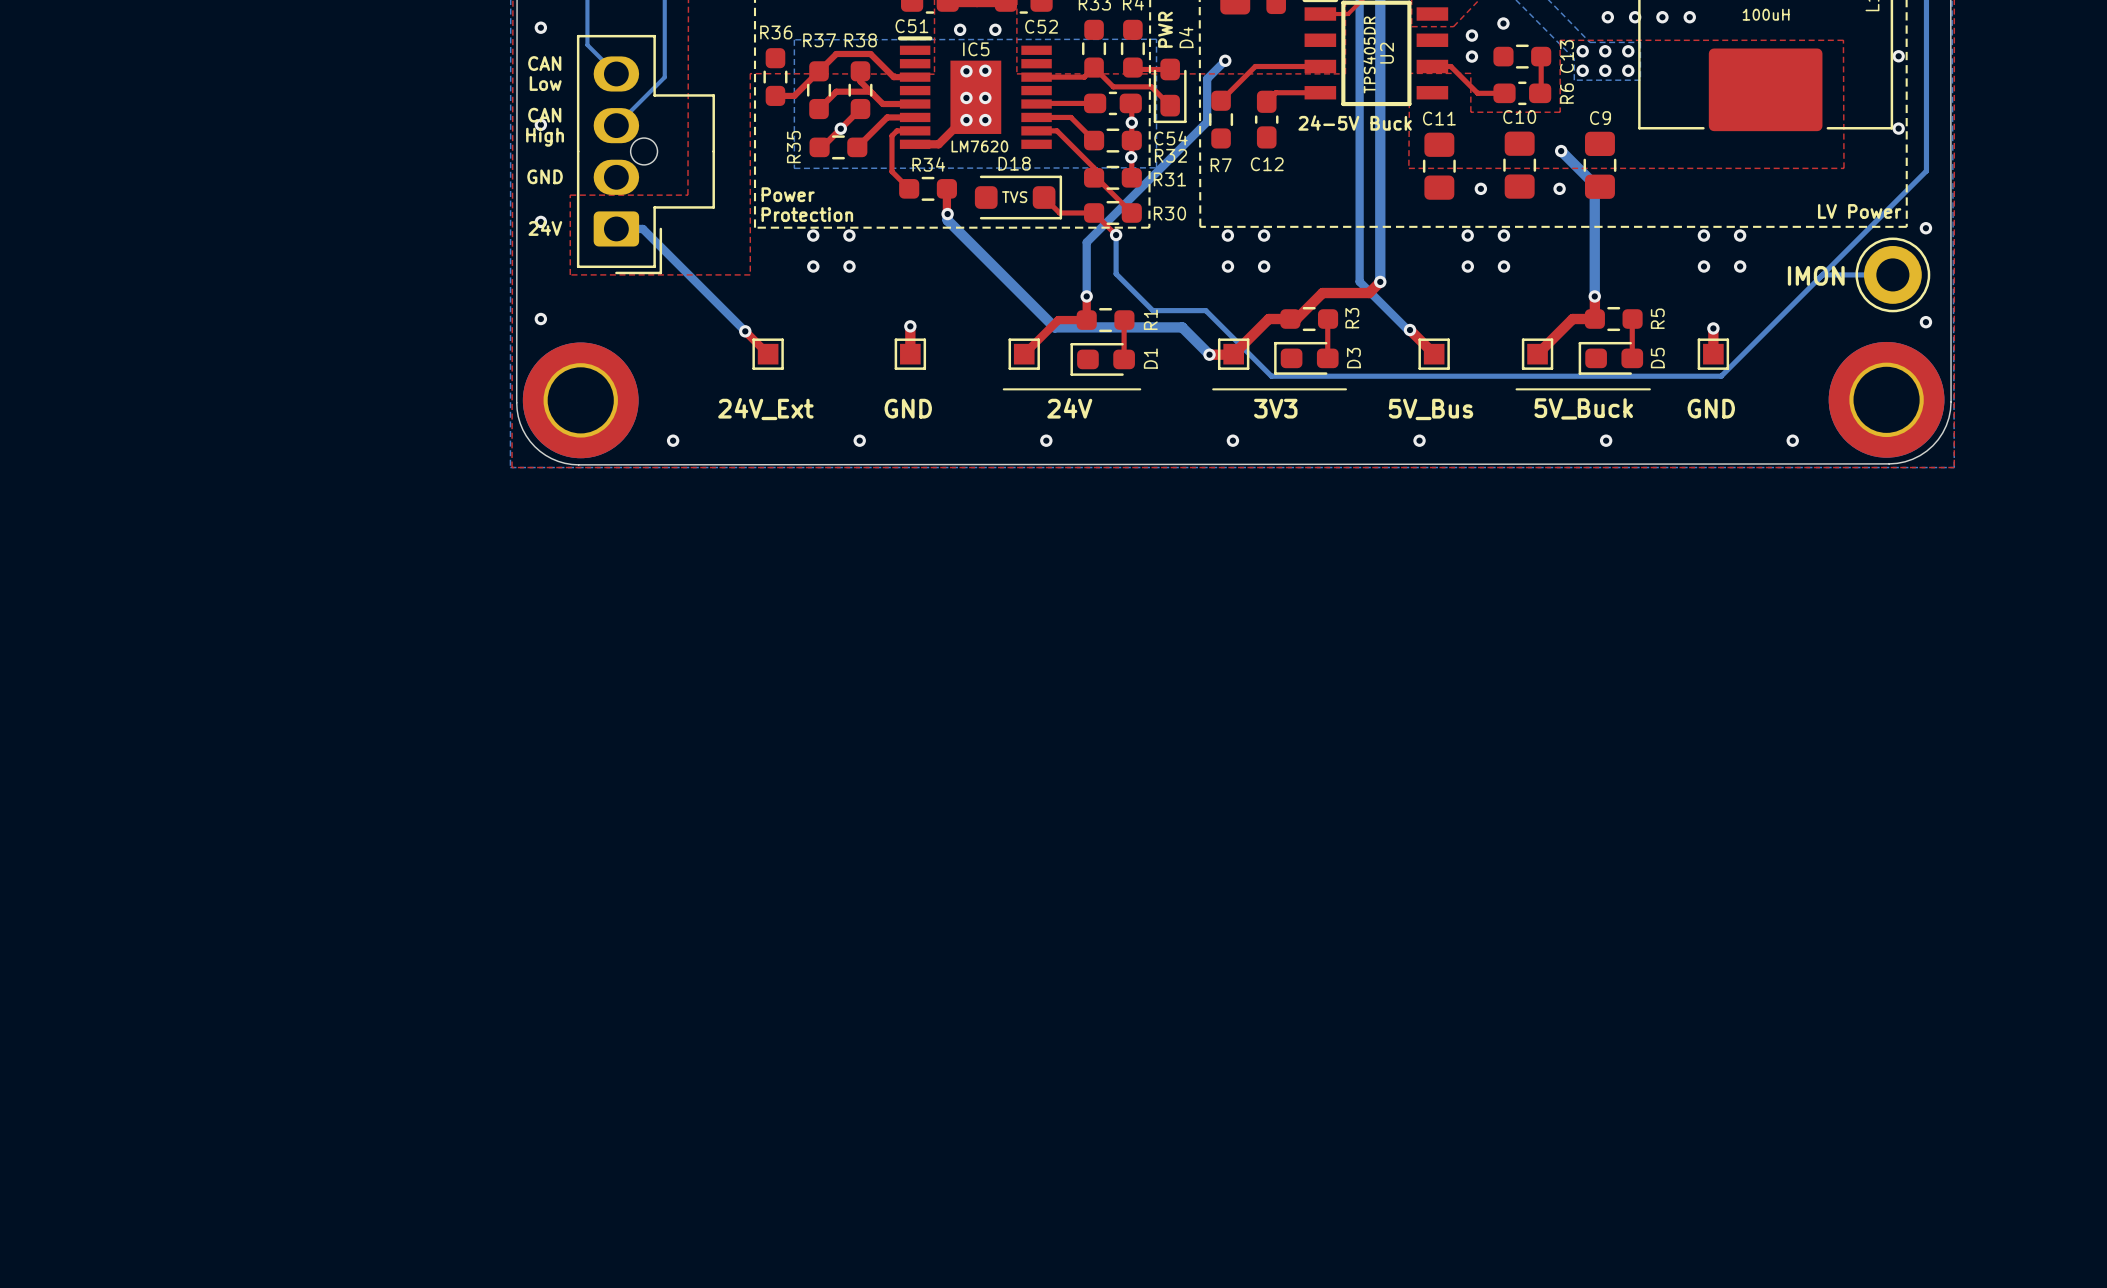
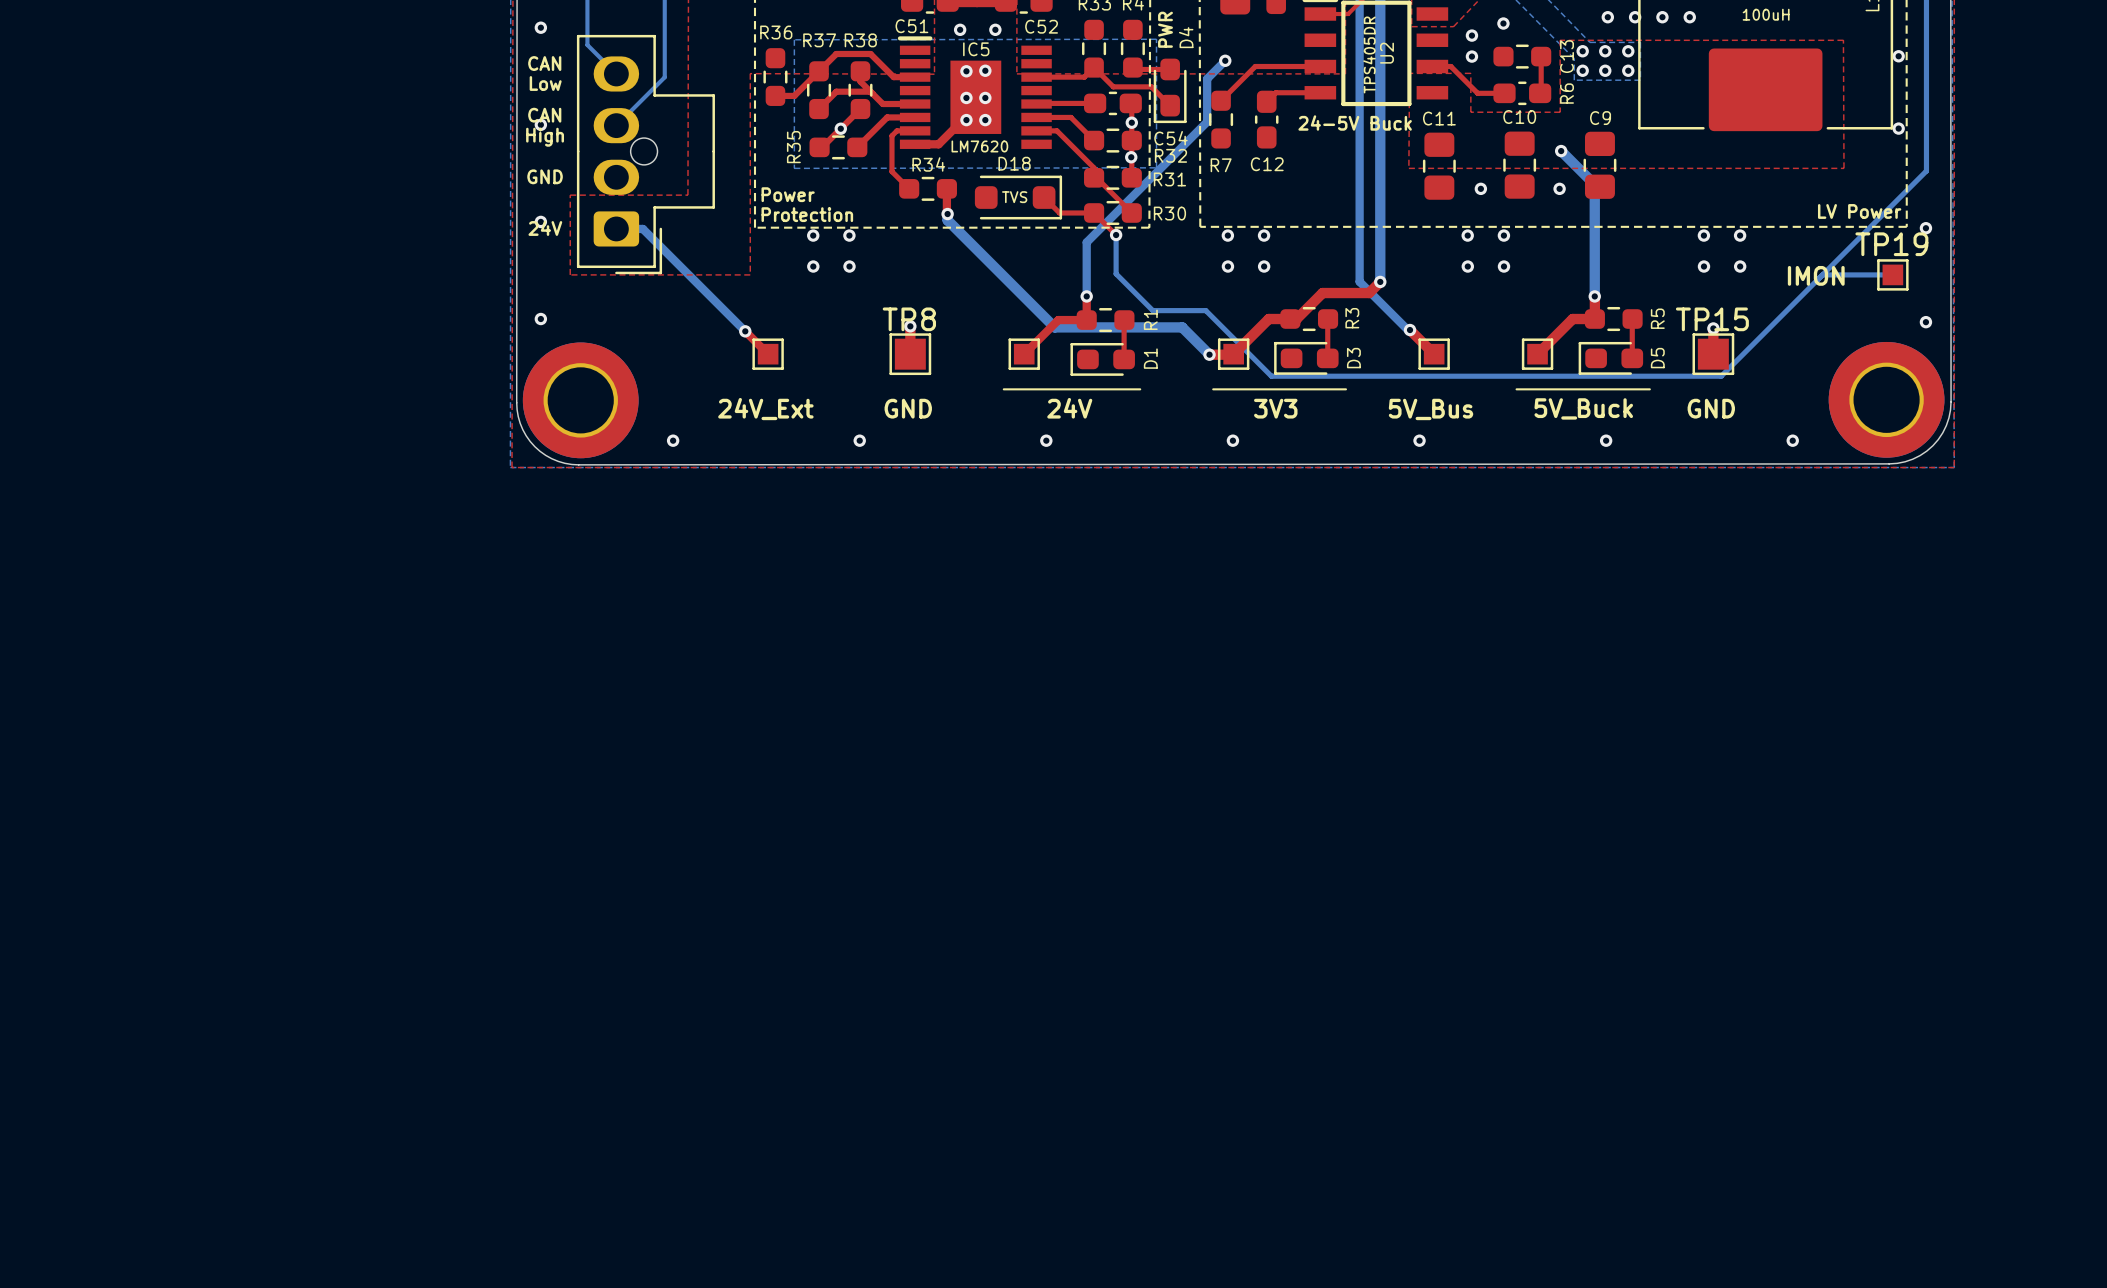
part: (1892, 274) -> none
TP19: none -> (1892, 274)
part: (910, 354) -> none
TP8: none -> (910, 354)
part: (1713, 354) -> none
TP15: none -> (1713, 354)

